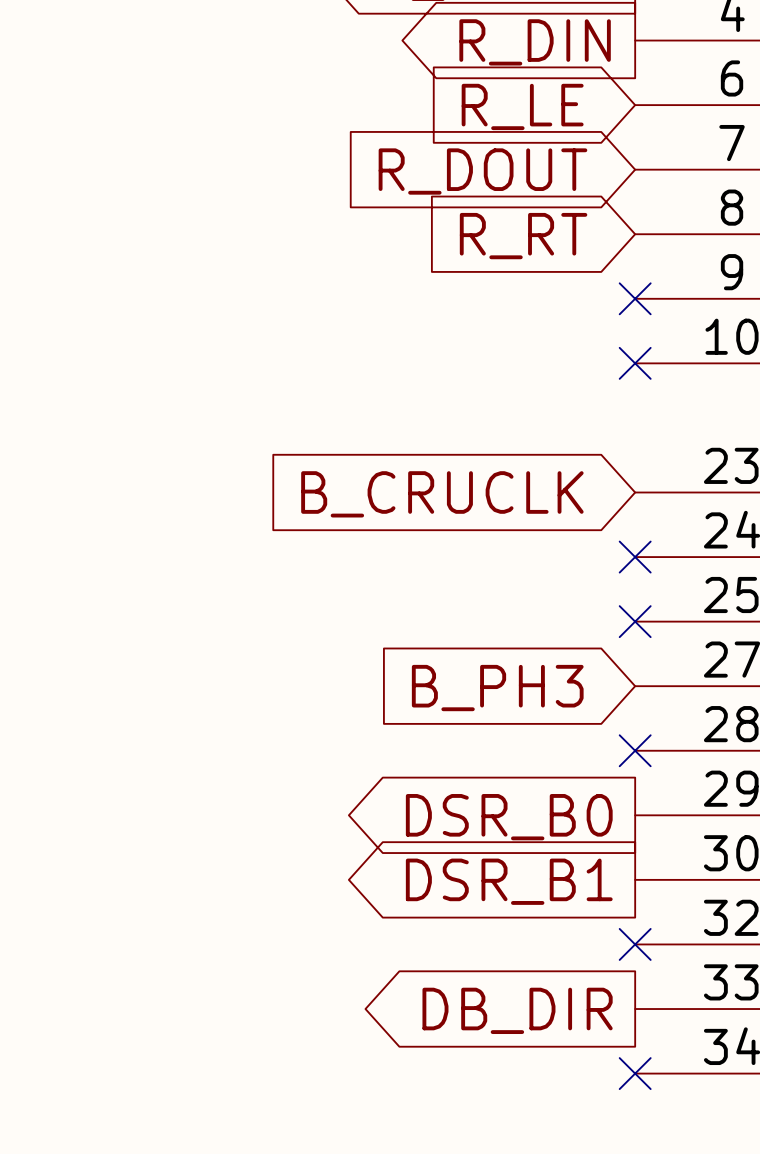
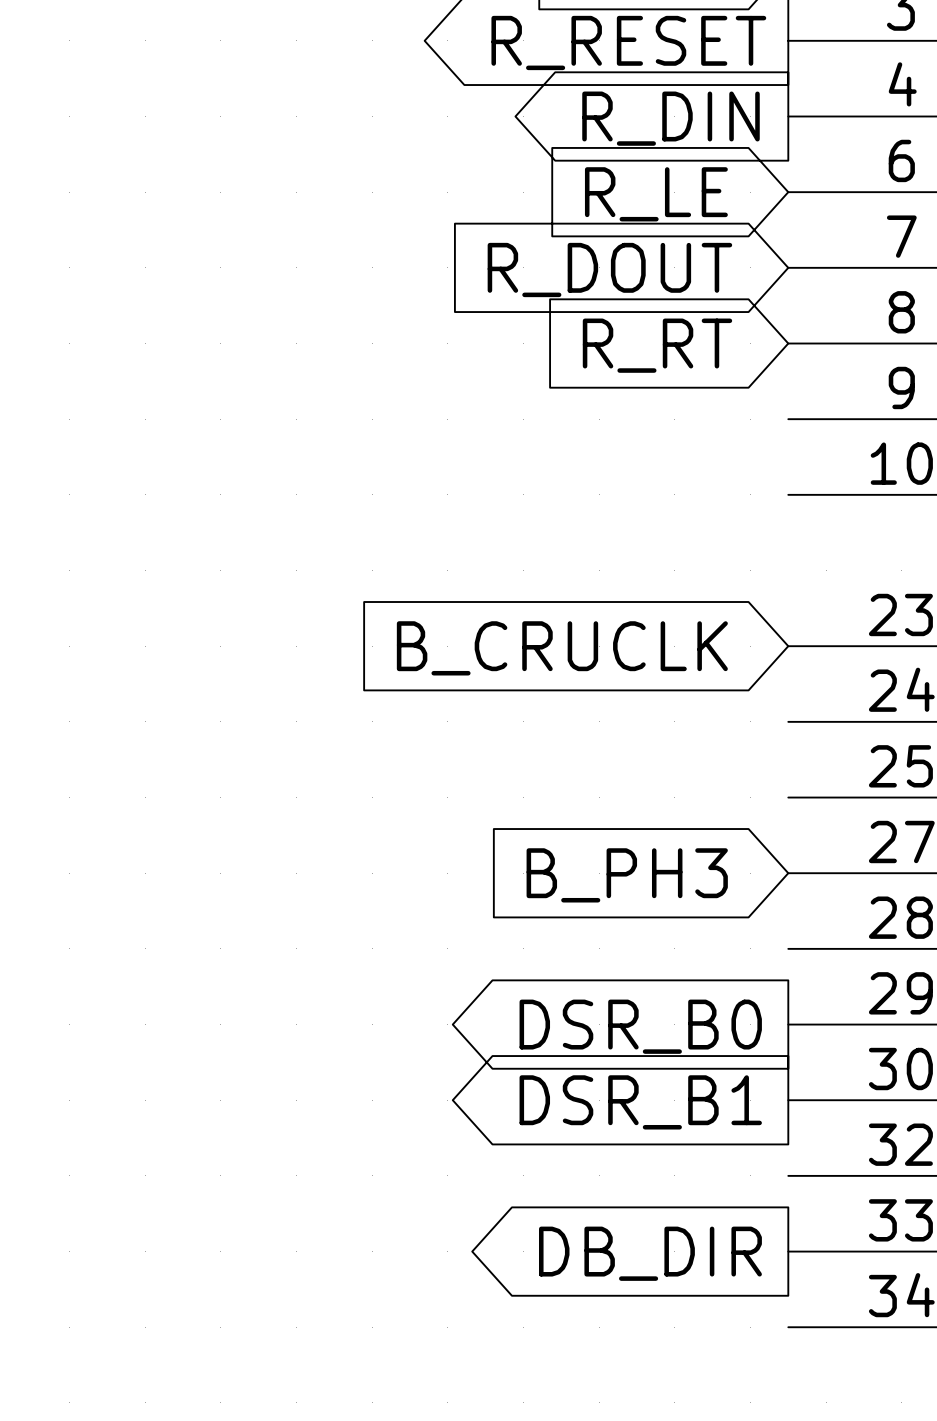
no-connect mark: (635, 298) -> none
no-connect mark: (635, 363) -> none
no-connect mark: (635, 557) -> none
no-connect mark: (635, 621) -> none
no-connect mark: (635, 750) -> none
no-connect mark: (635, 944) -> none
no-connect mark: (635, 1073) -> none

